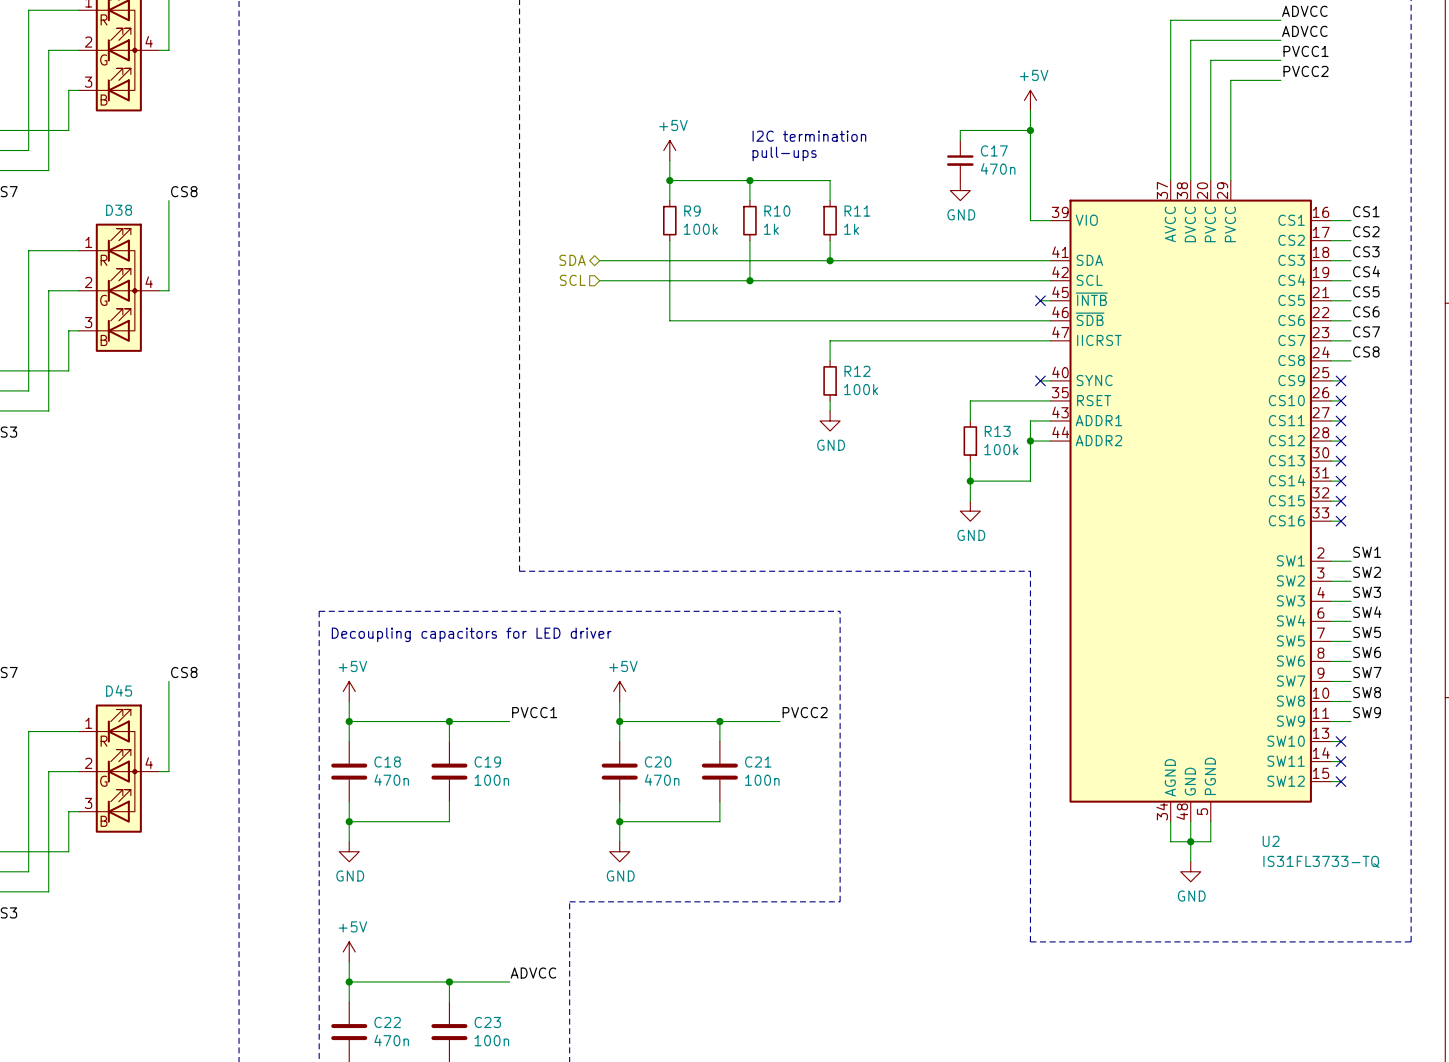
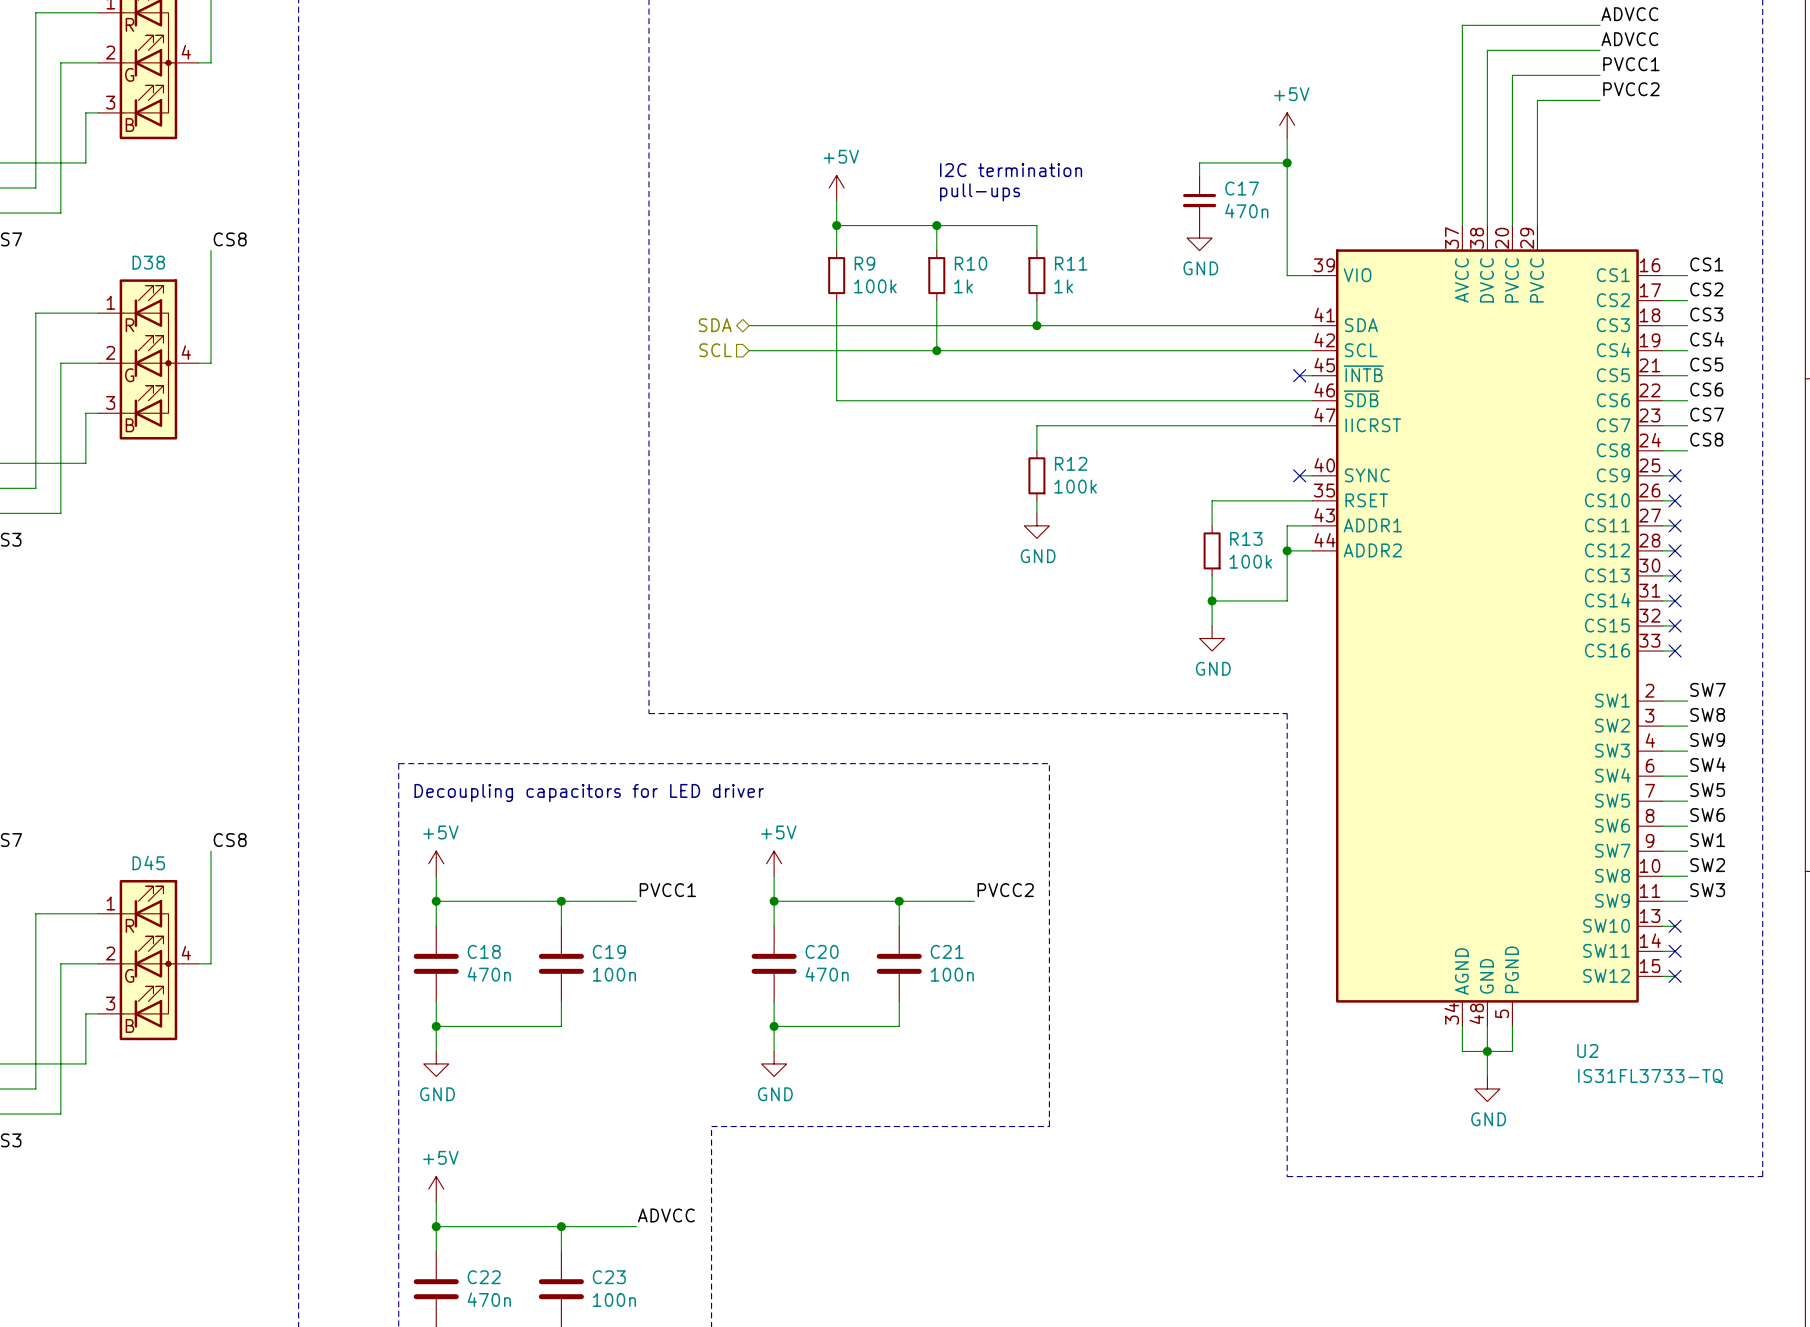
label: SW1 (1367, 552) -> SW7 (1707, 689)
label: SW2 (1367, 572) -> SW8 (1707, 714)
label: SW3 (1367, 592) -> SW9 (1707, 739)
label: SW7 (1367, 672) -> SW1 (1707, 840)
label: SW8 (1367, 692) -> SW2 (1707, 865)
label: SW9 (1367, 712) -> SW3 (1707, 890)

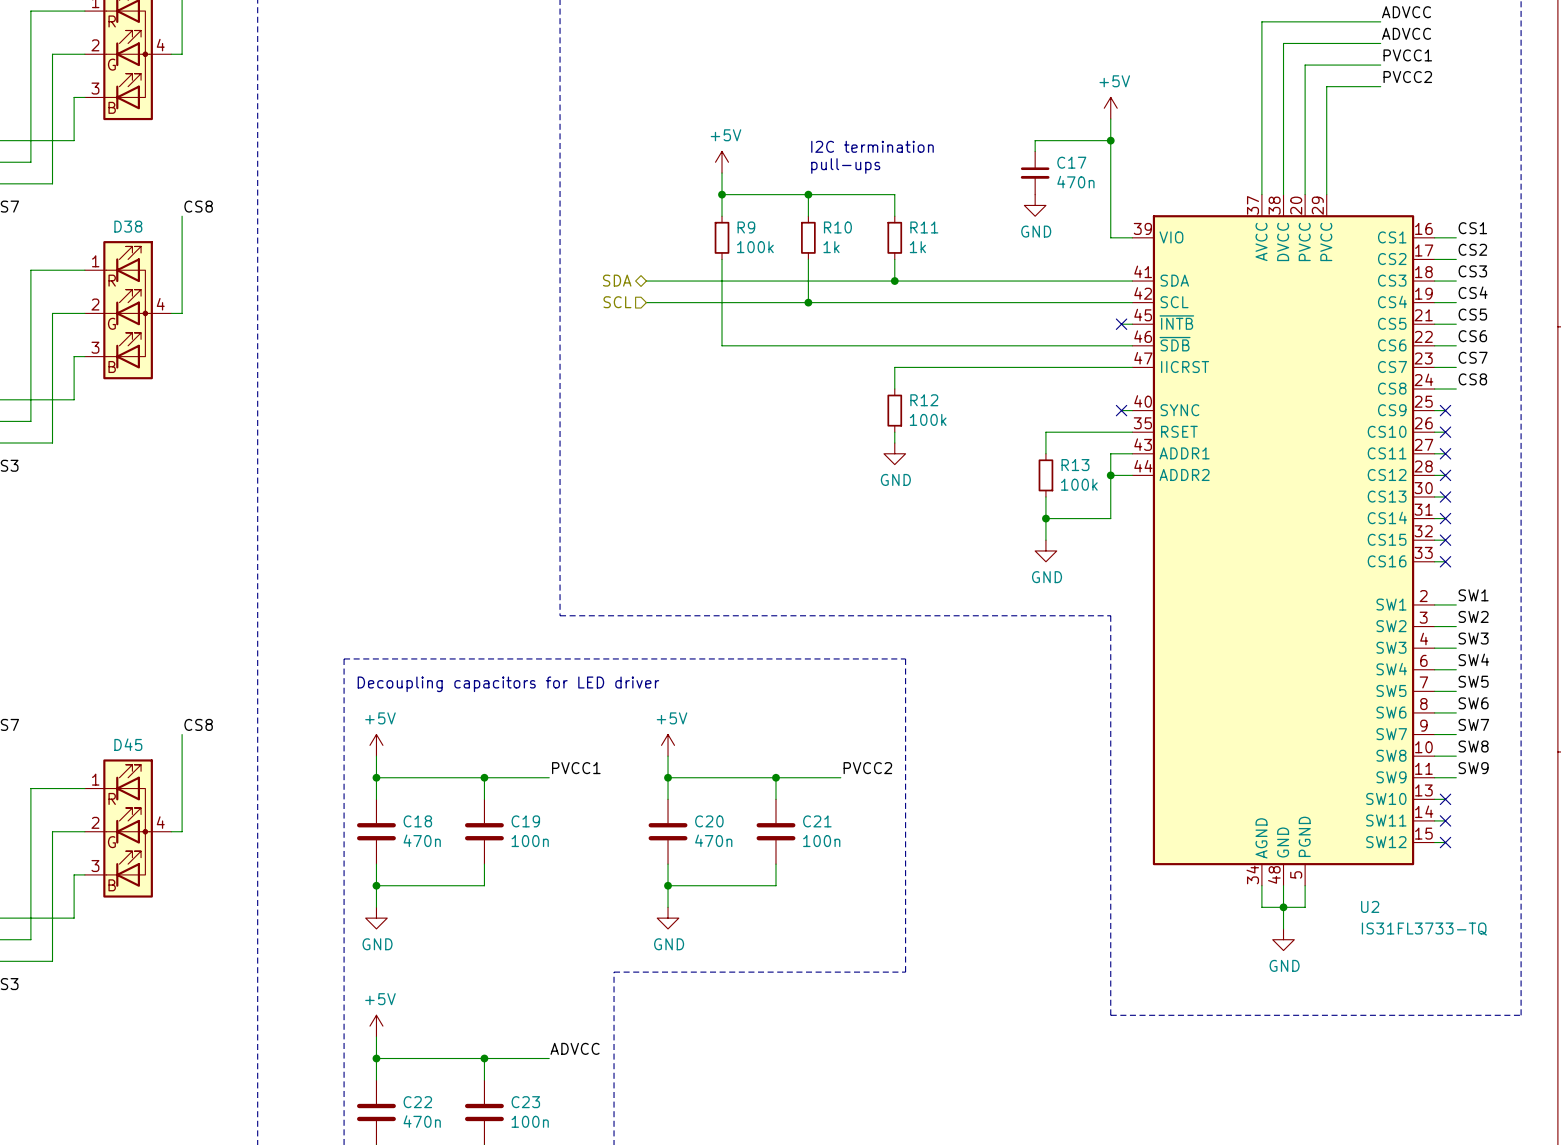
label: SW7 (1707, 689) -> SW1 (1473, 595)
label: SW8 (1707, 714) -> SW2 (1473, 616)
label: SW9 (1707, 739) -> SW3 (1473, 638)
label: SW1 (1707, 840) -> SW7 (1473, 724)
label: SW2 (1707, 865) -> SW8 (1473, 746)
label: SW3 (1707, 890) -> SW9 (1473, 768)

